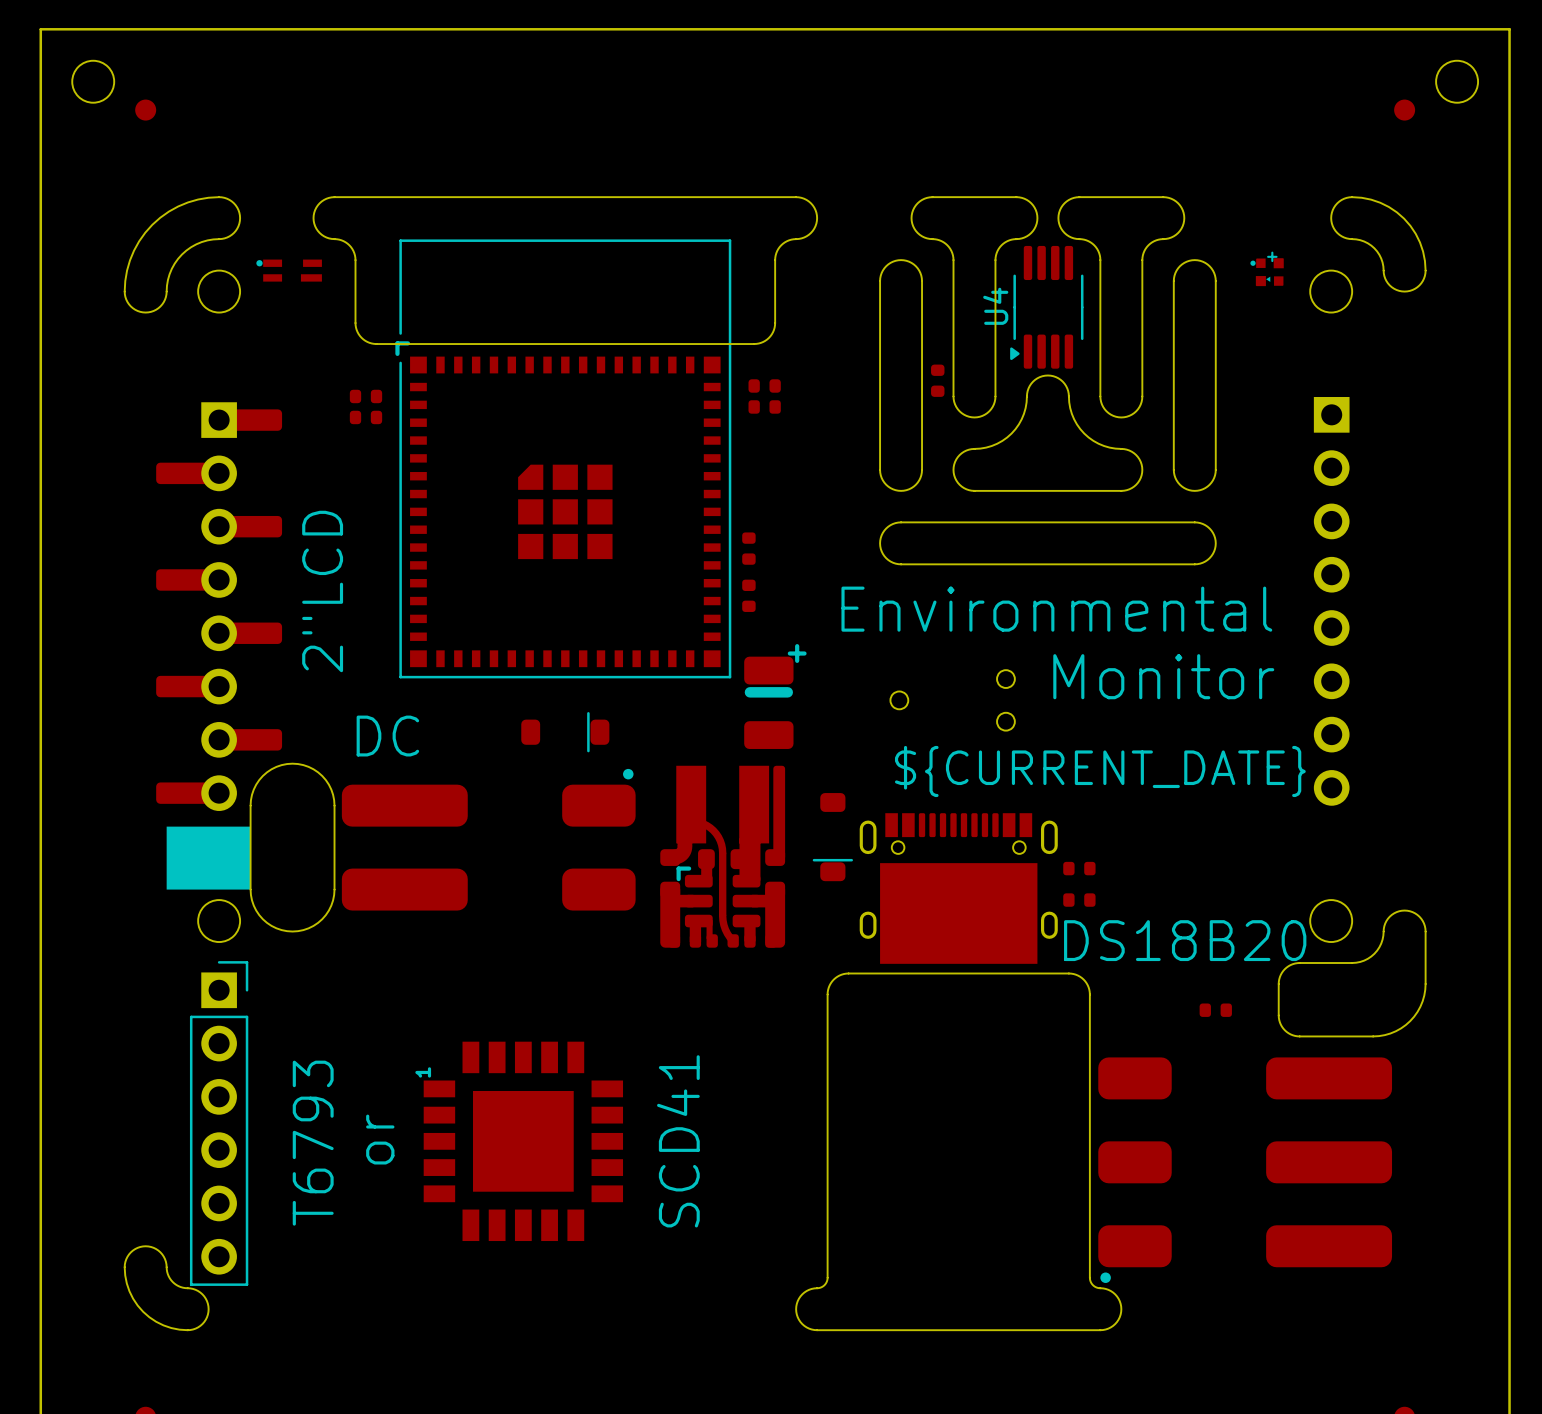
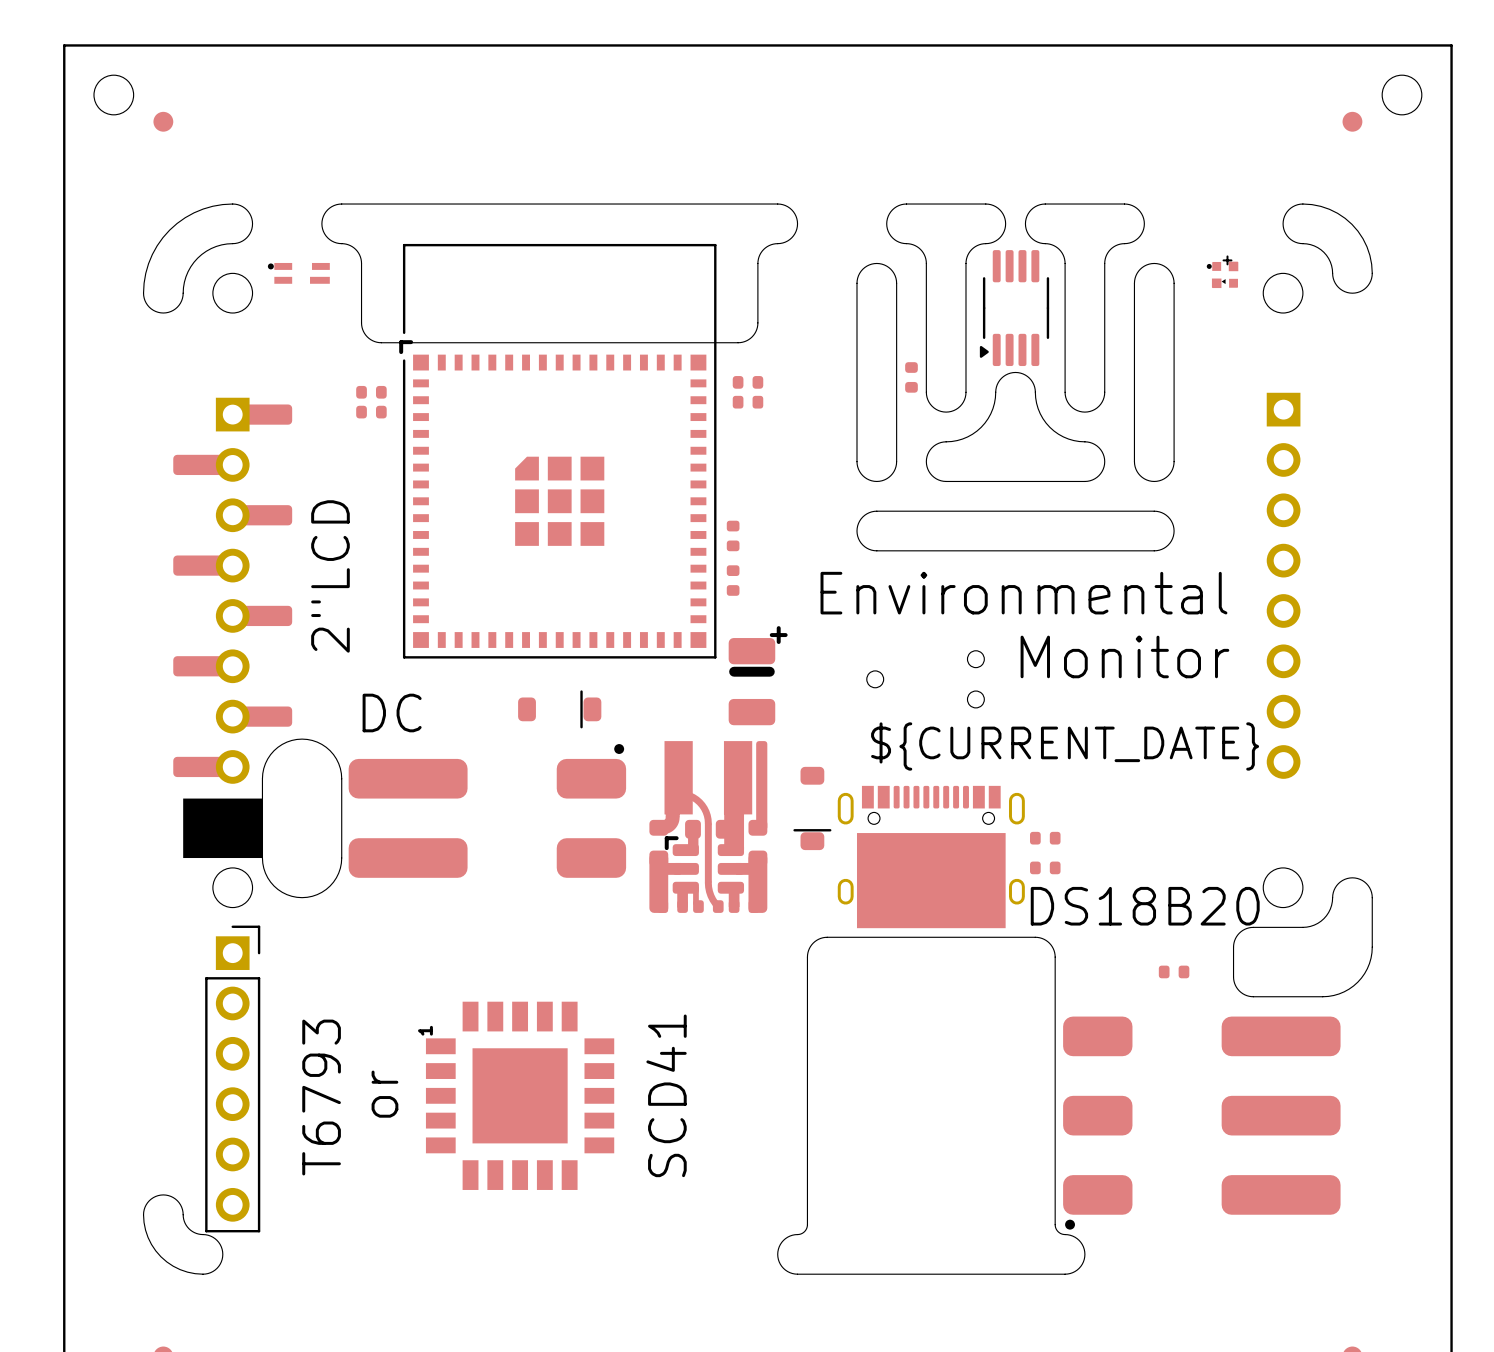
U4 name: U4 (995, 306) -> none

